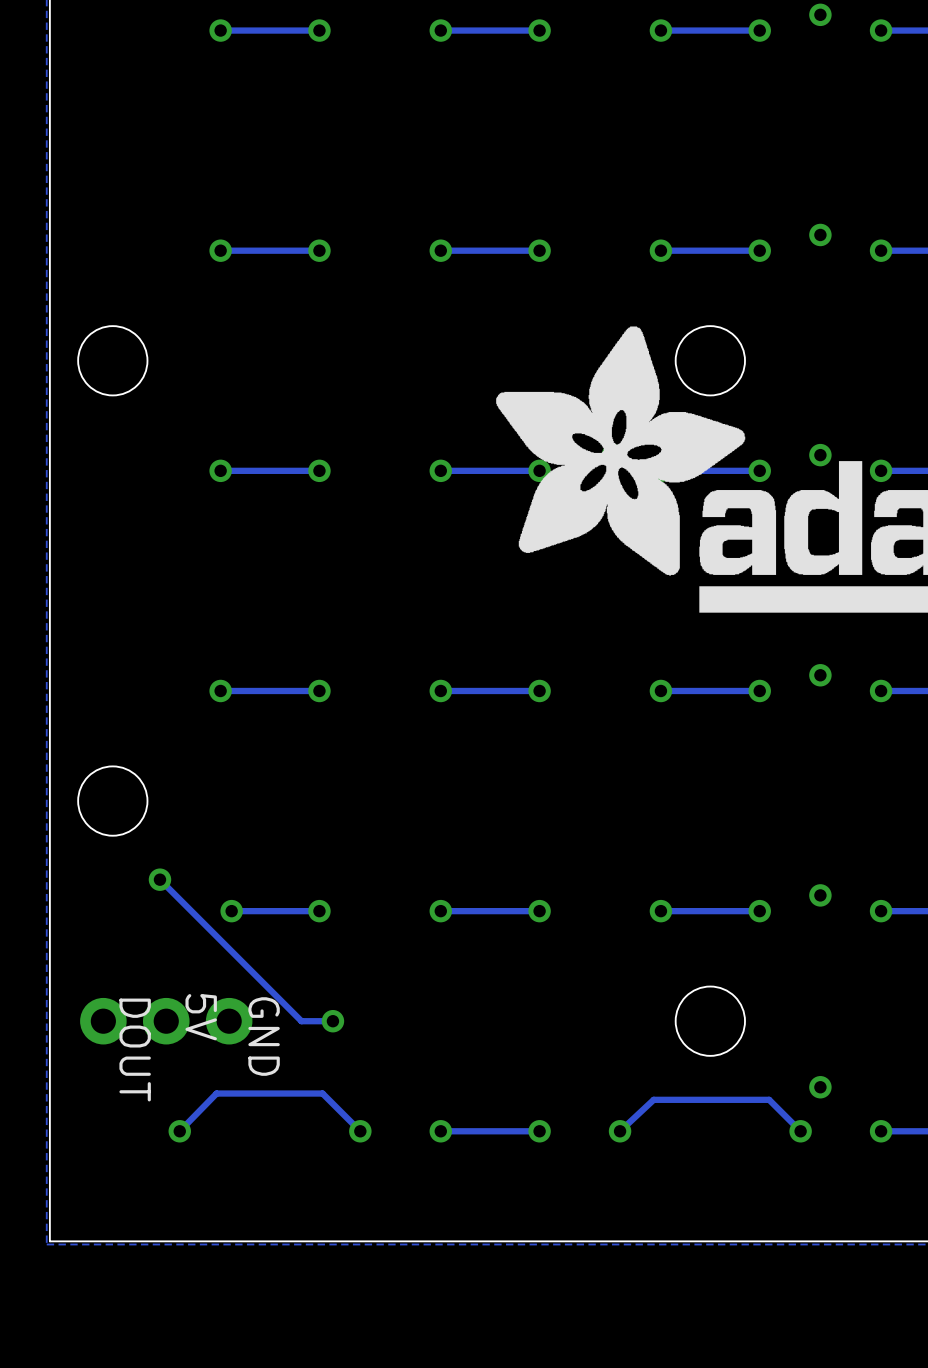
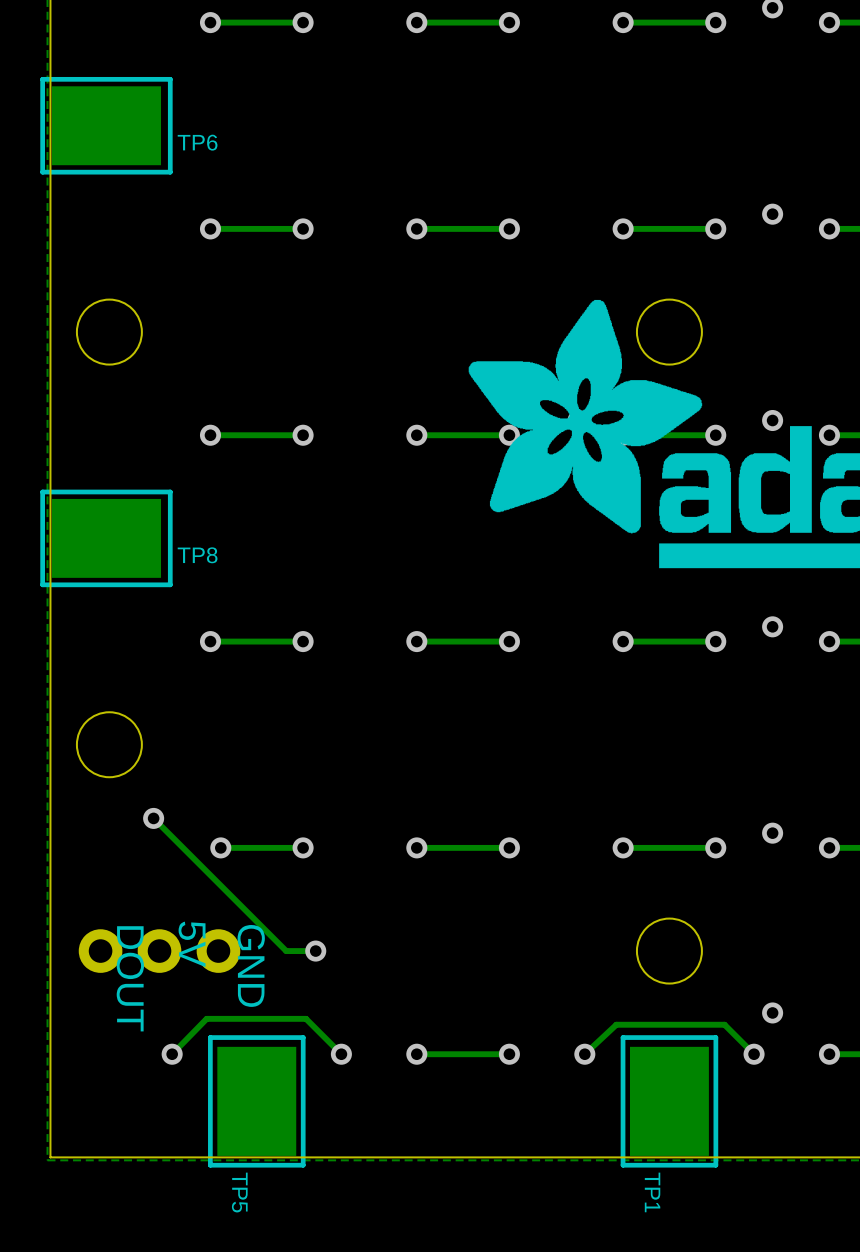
TP6: none -> (106, 125)
TP8: none -> (106, 538)
TP5: none -> (256, 1101)
TP1: none -> (669, 1101)

